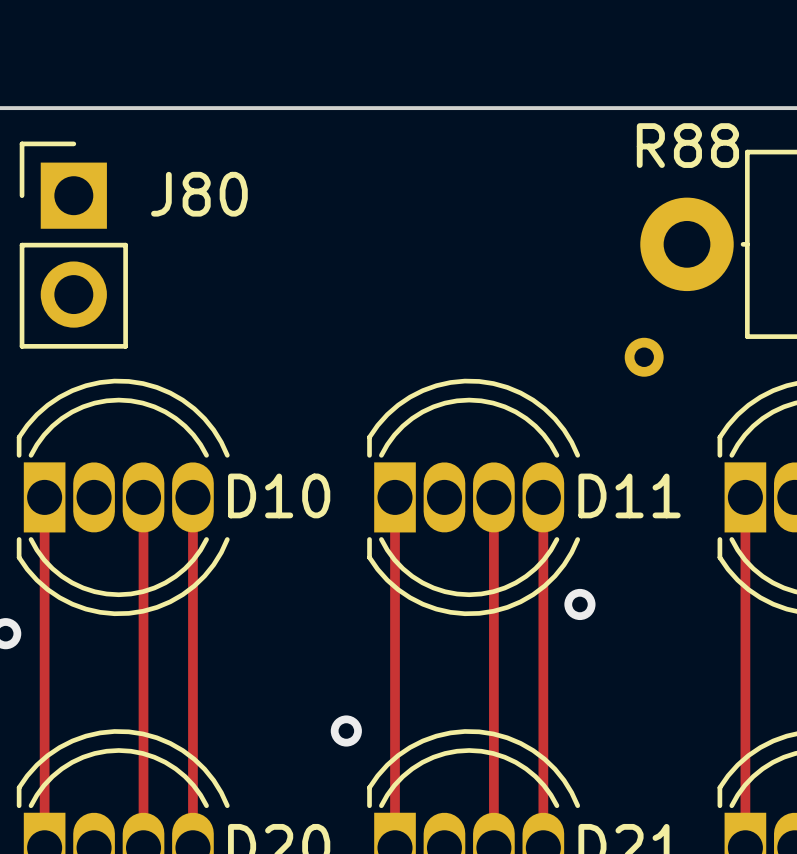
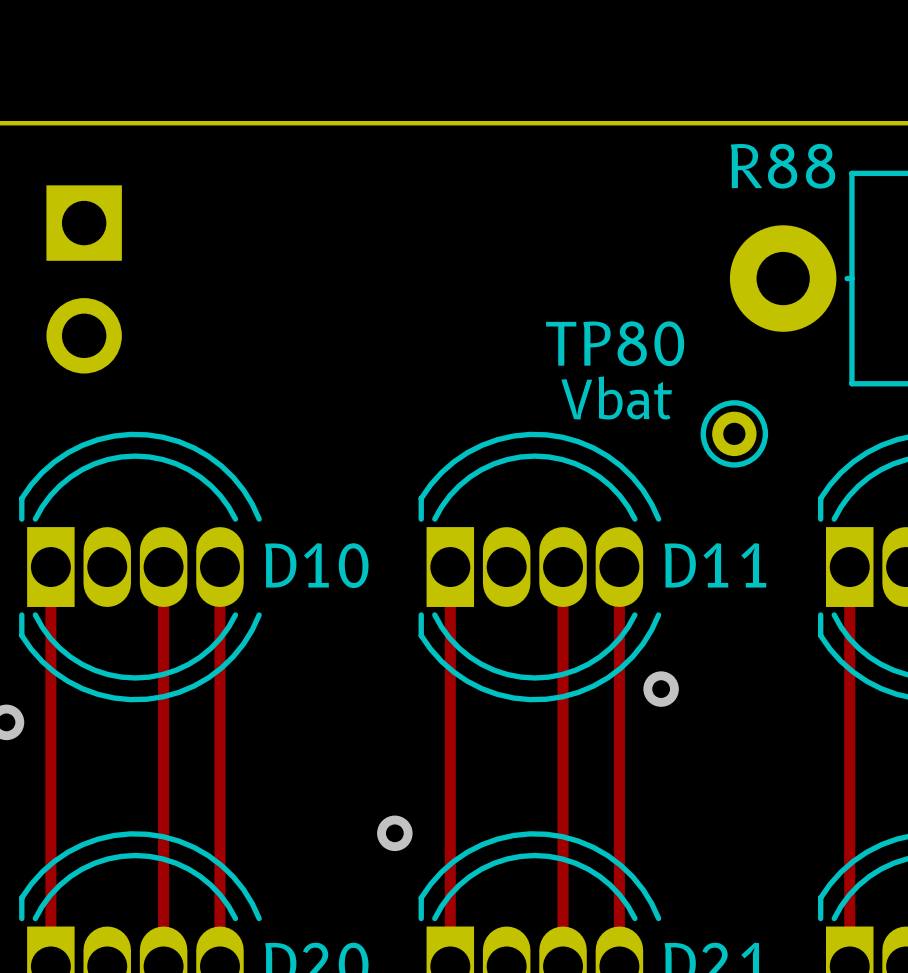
J80 side: top (73, 245) -> bottom (84, 279)
text: none -> Vbat (616, 398)
TP80 side: bottom (644, 357) -> top (734, 433)

